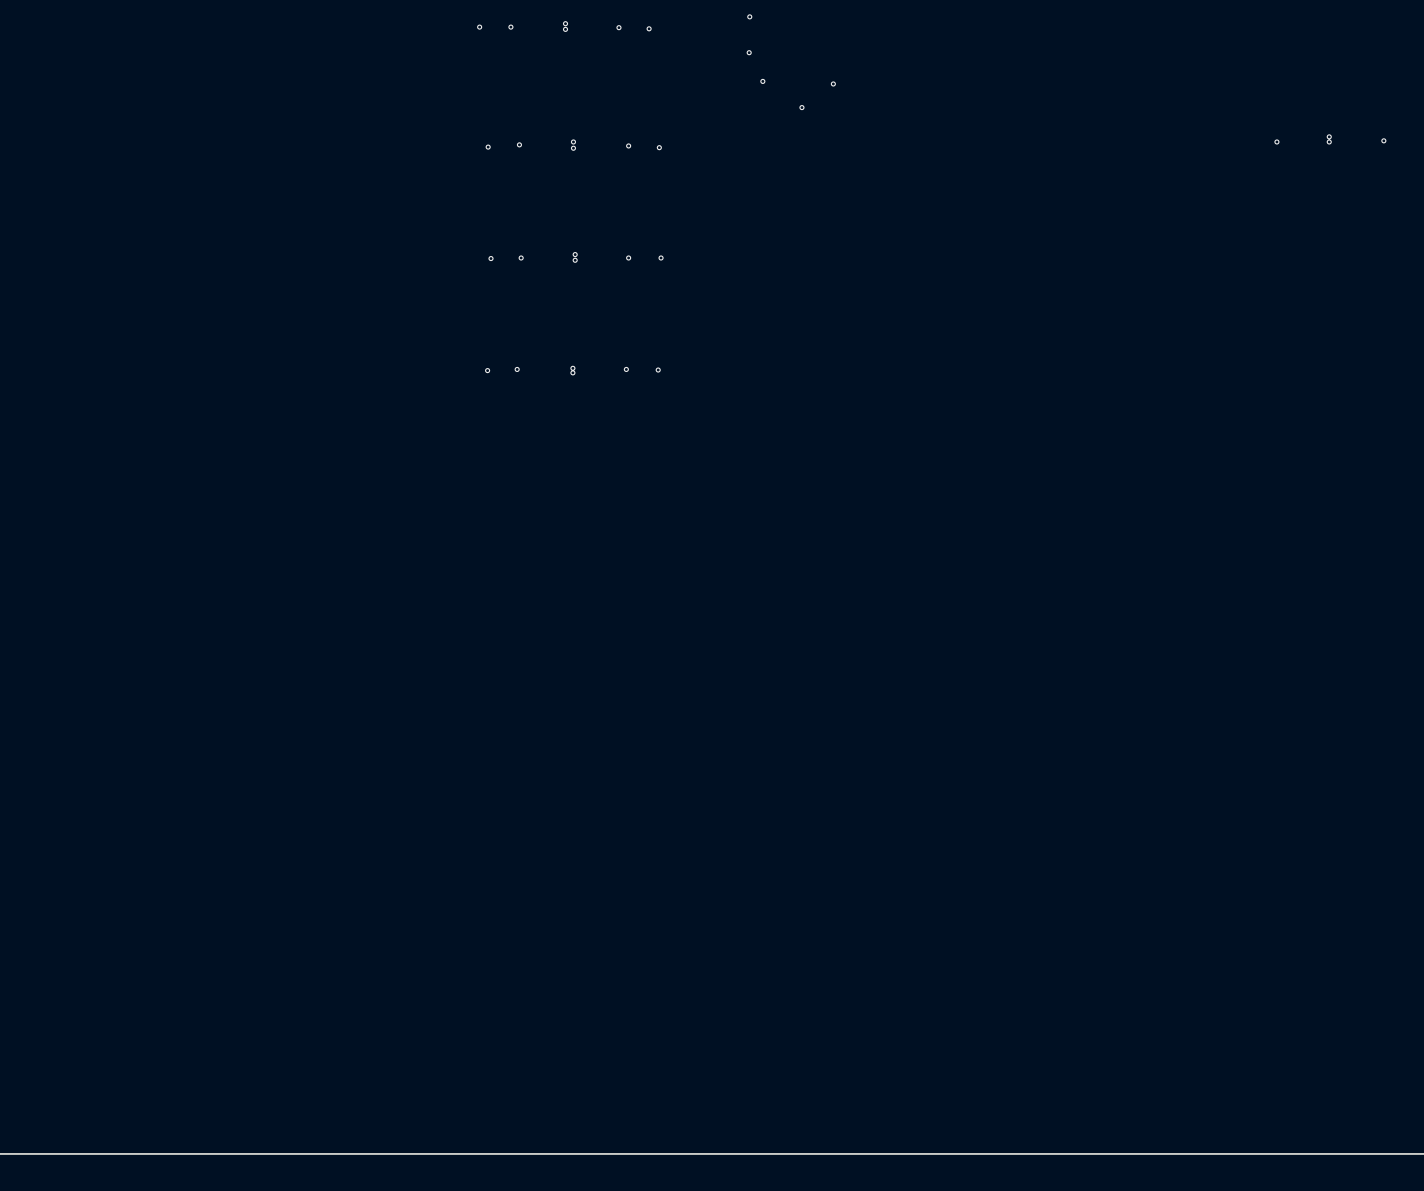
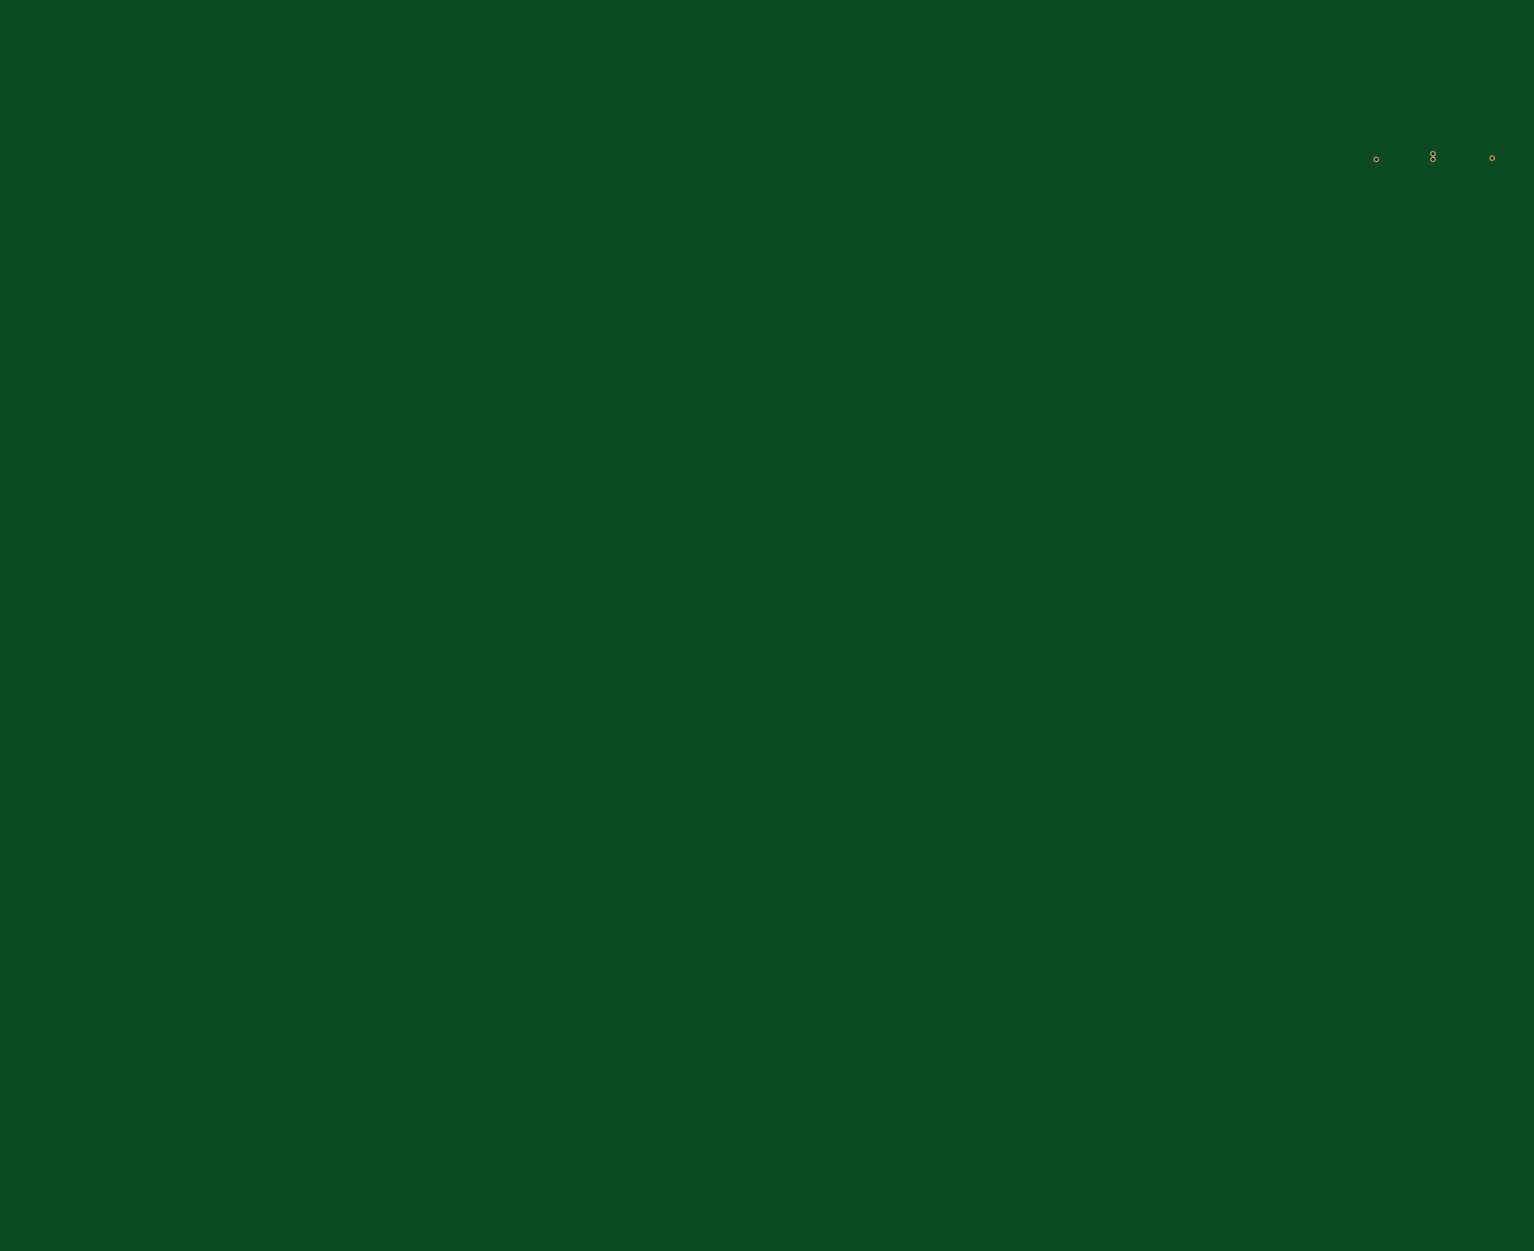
via: (749, 16) -> none
via: (565, 23) -> none
via: (479, 27) -> none
via: (510, 27) -> none
via: (618, 27) -> none
via: (649, 28) -> none
via: (565, 29) -> none
via: (749, 52) -> none
via: (762, 81) -> none
via: (833, 83) -> none
via: (801, 107) -> none
via: (573, 141) -> none
via: (519, 144) -> none
via: (628, 145) -> none
via: (488, 147) -> none
via: (659, 147) -> none
via: (573, 148) -> none
via: (575, 254) -> none
via: (521, 257) -> none
via: (628, 257) -> none
via: (661, 257) -> none
via: (491, 258) -> none
via: (575, 260) -> none
via: (572, 368) -> none
via: (517, 369) -> none
via: (626, 369) -> none
via: (487, 370) -> none
via: (658, 370) -> none
via: (572, 372) -> none

